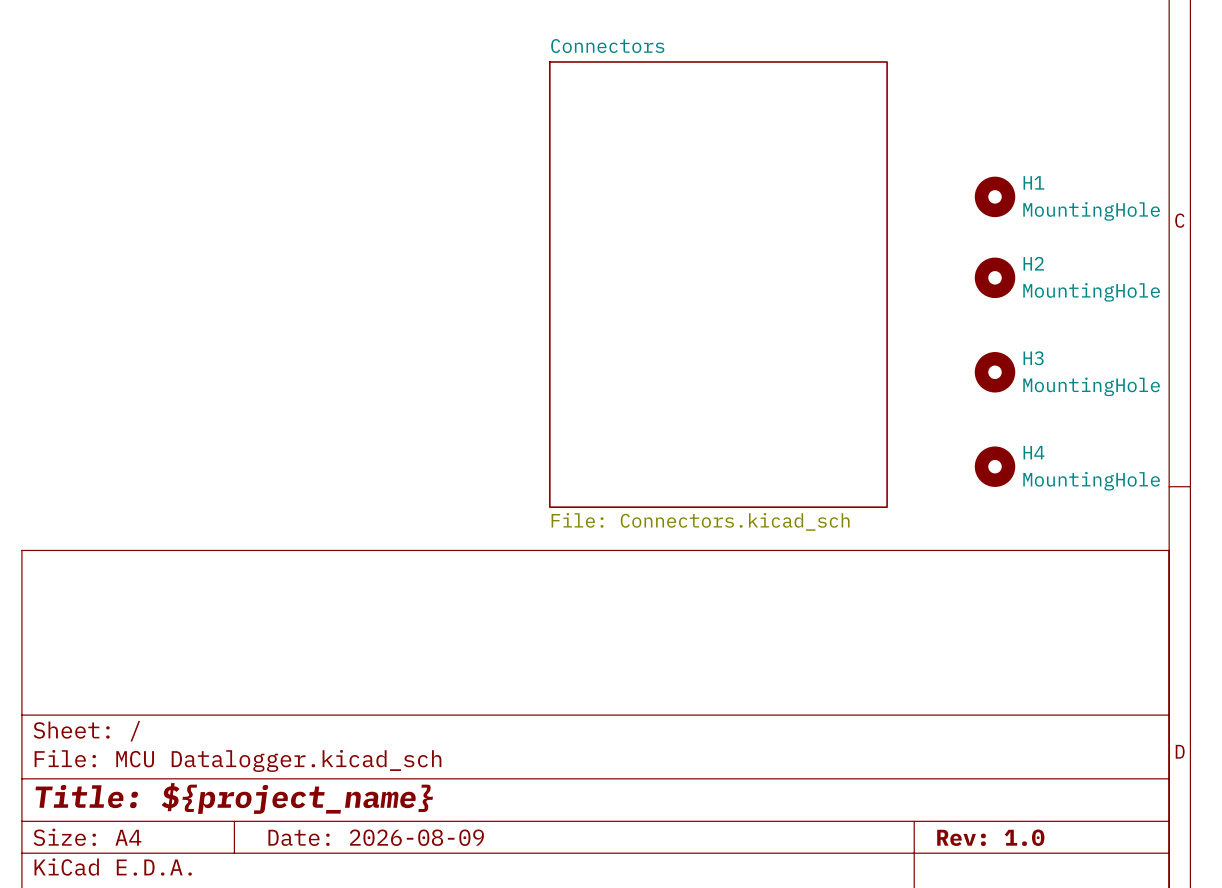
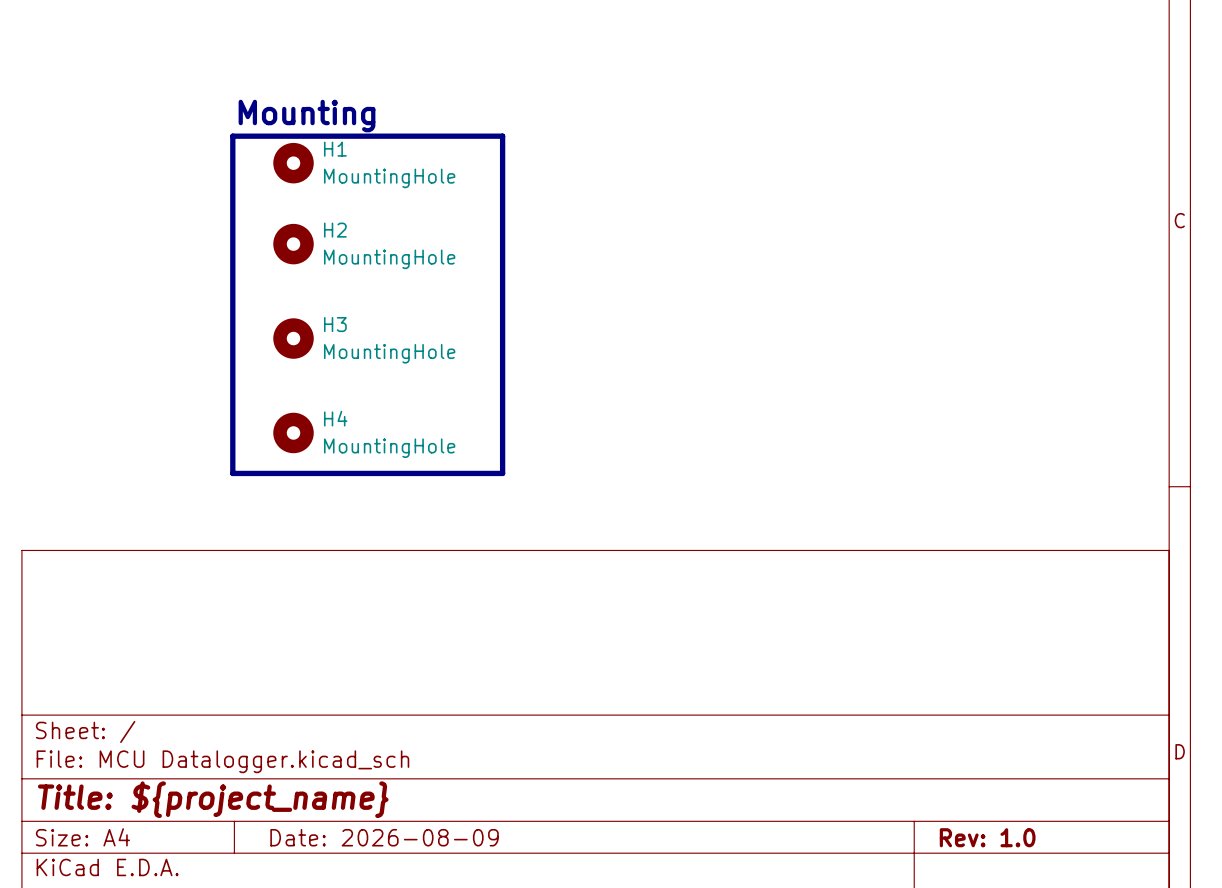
text: none -> Mounting (307, 116)
line: none -> (232, 136) (502, 136) (502, 473) (232, 473) (232, 136)
H1 position: (995, 196) -> (293, 163)
H2 position: (995, 277) -> (293, 244)
sheet Connectors: File: Connectors.kicad_sch (718, 284) -> none
H3 position: (995, 372) -> (293, 338)
H4 position: (995, 466) -> (293, 432)

